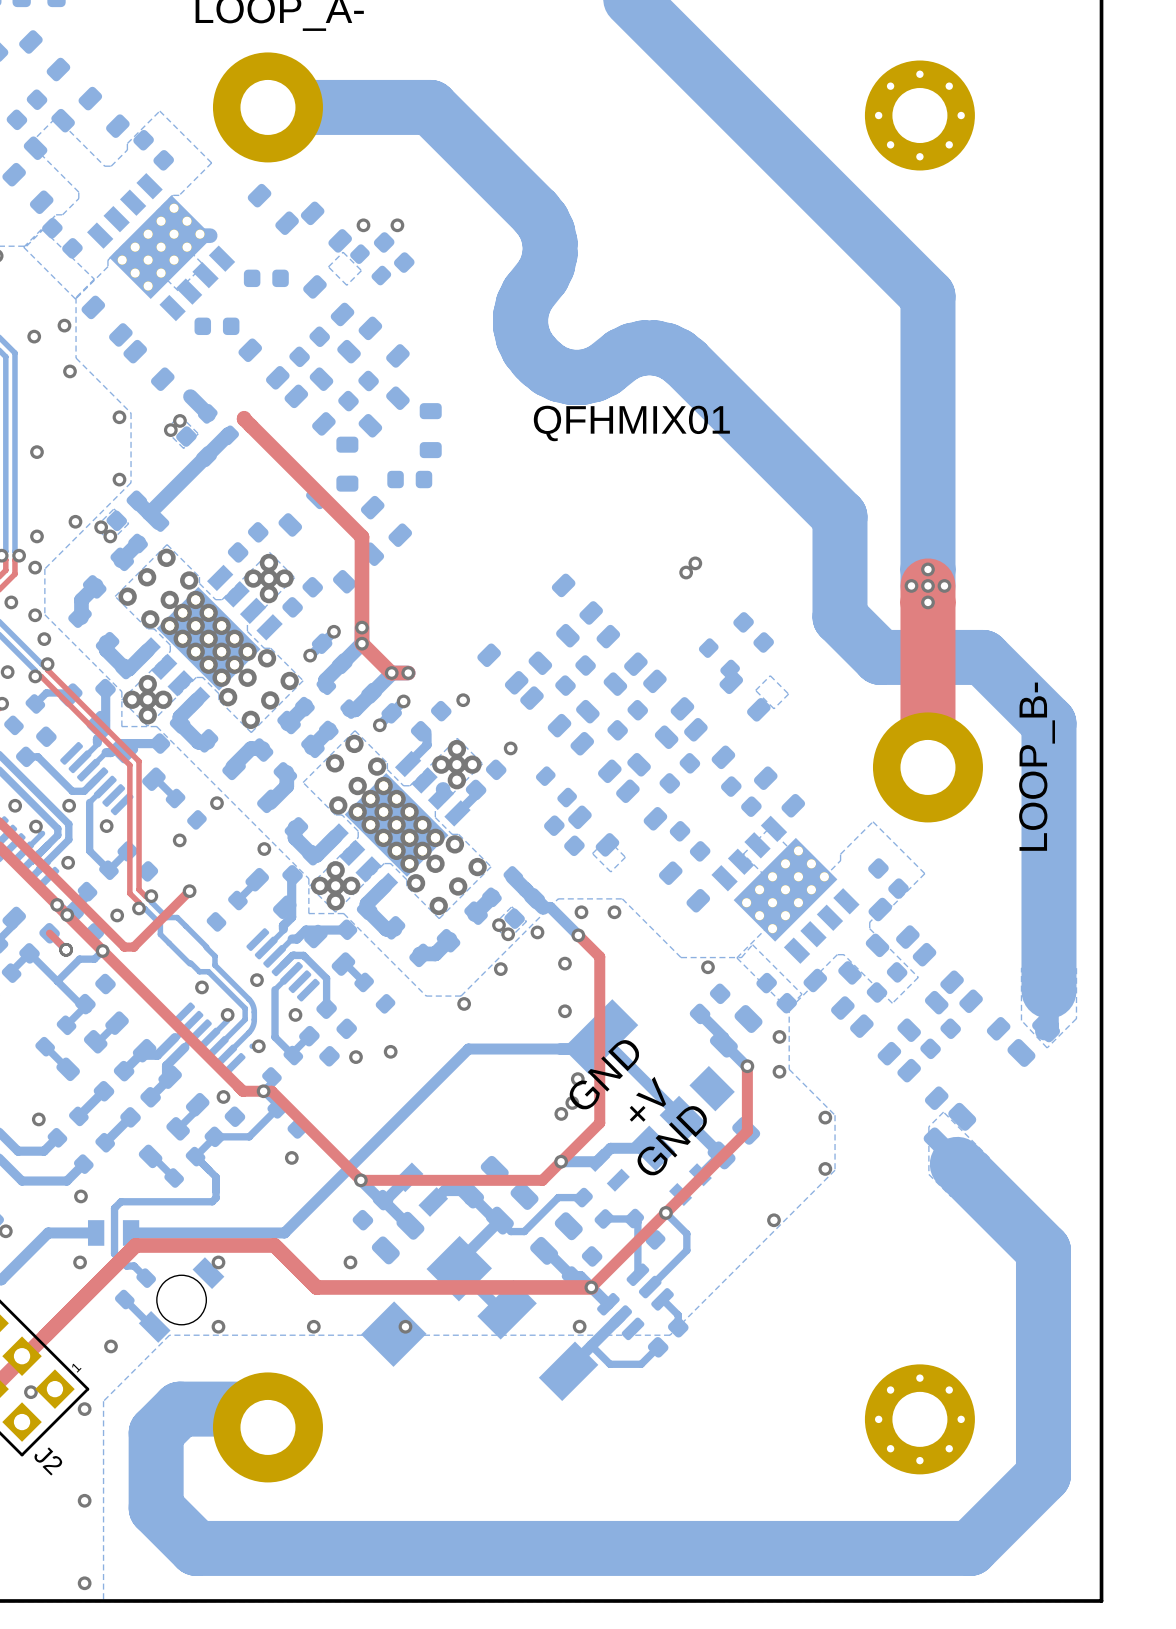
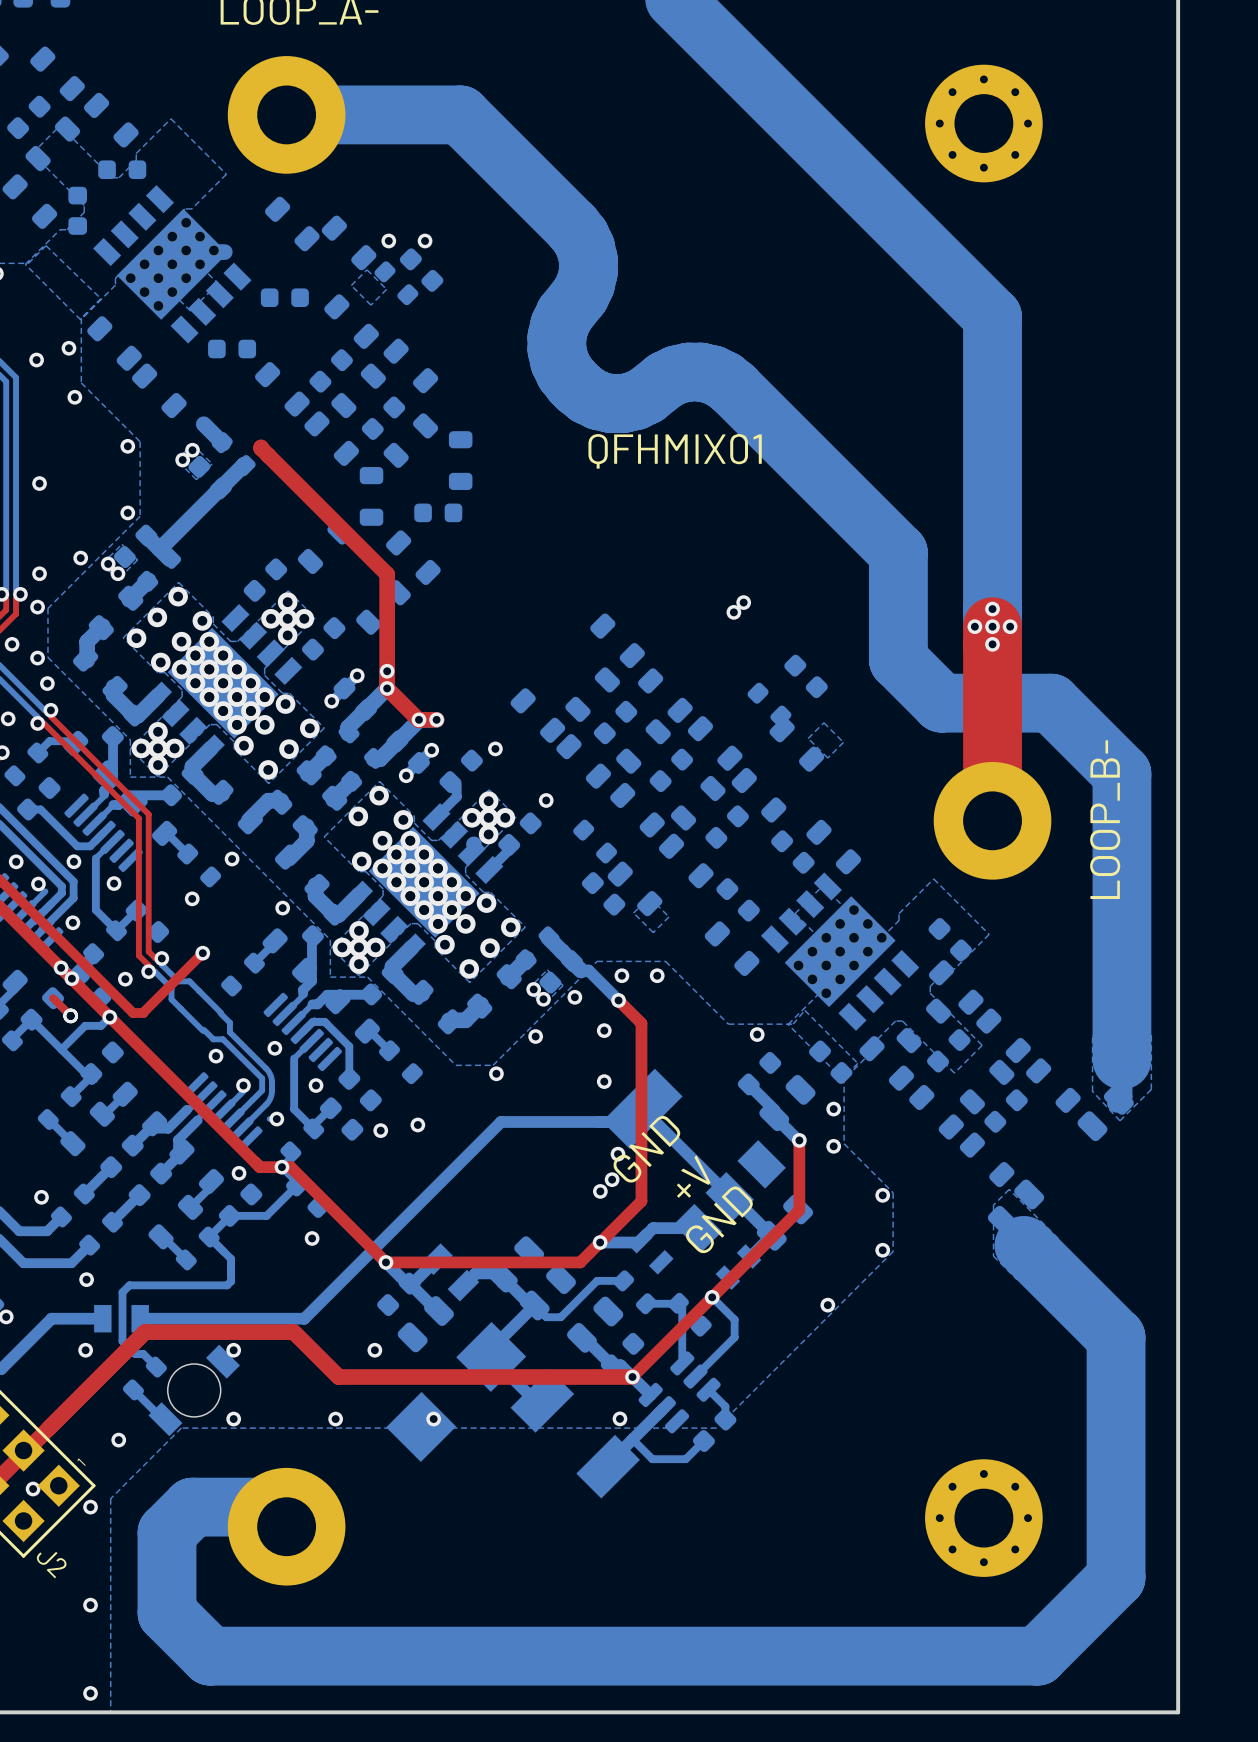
part position: (44, 55) -> (57, 73)
part: (153, 150) -> none
part: none -> (122, 169)
part: none -> (77, 210)
part: (62, 238) -> none

